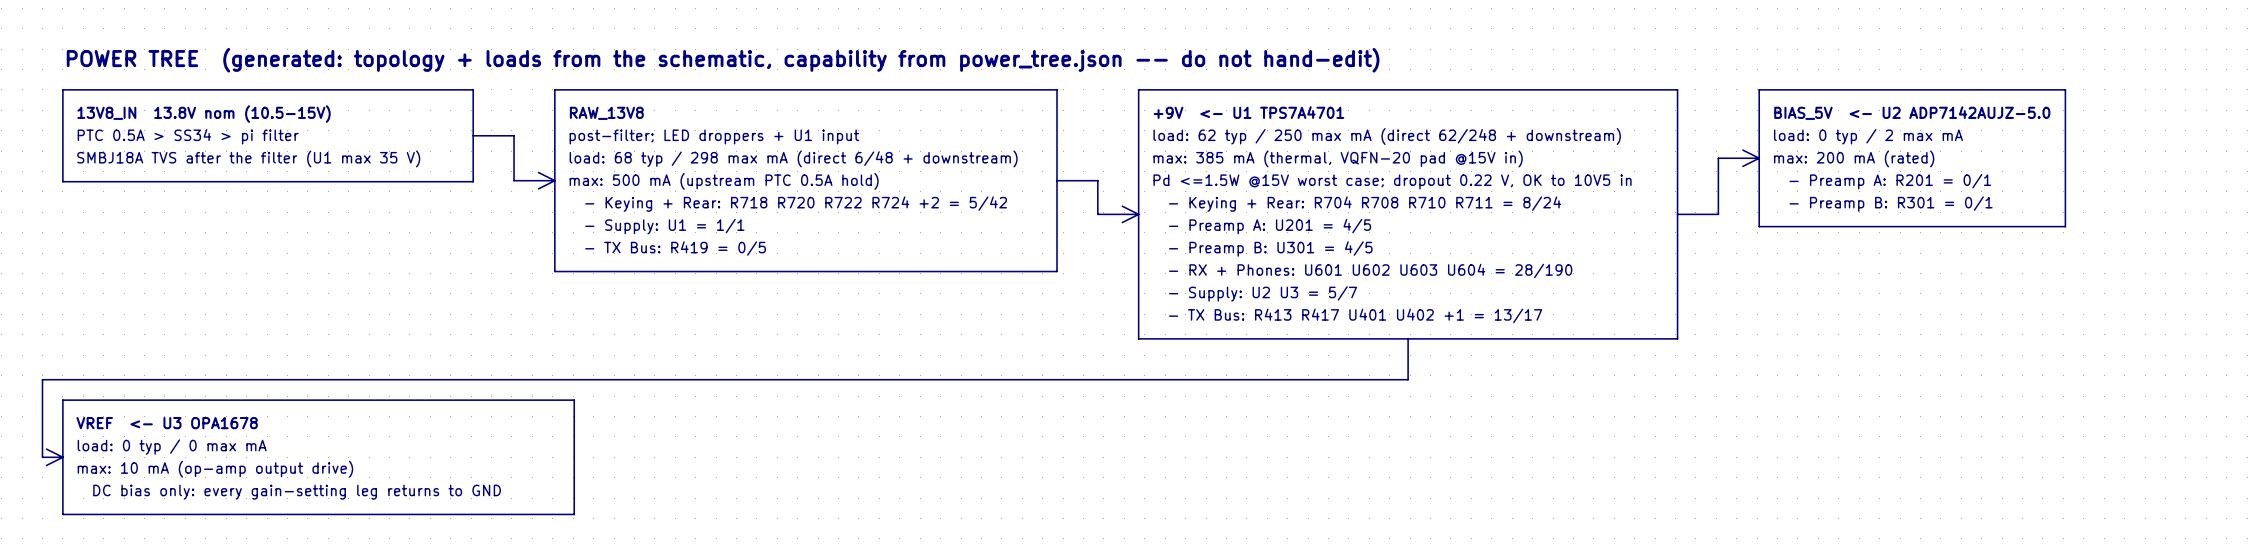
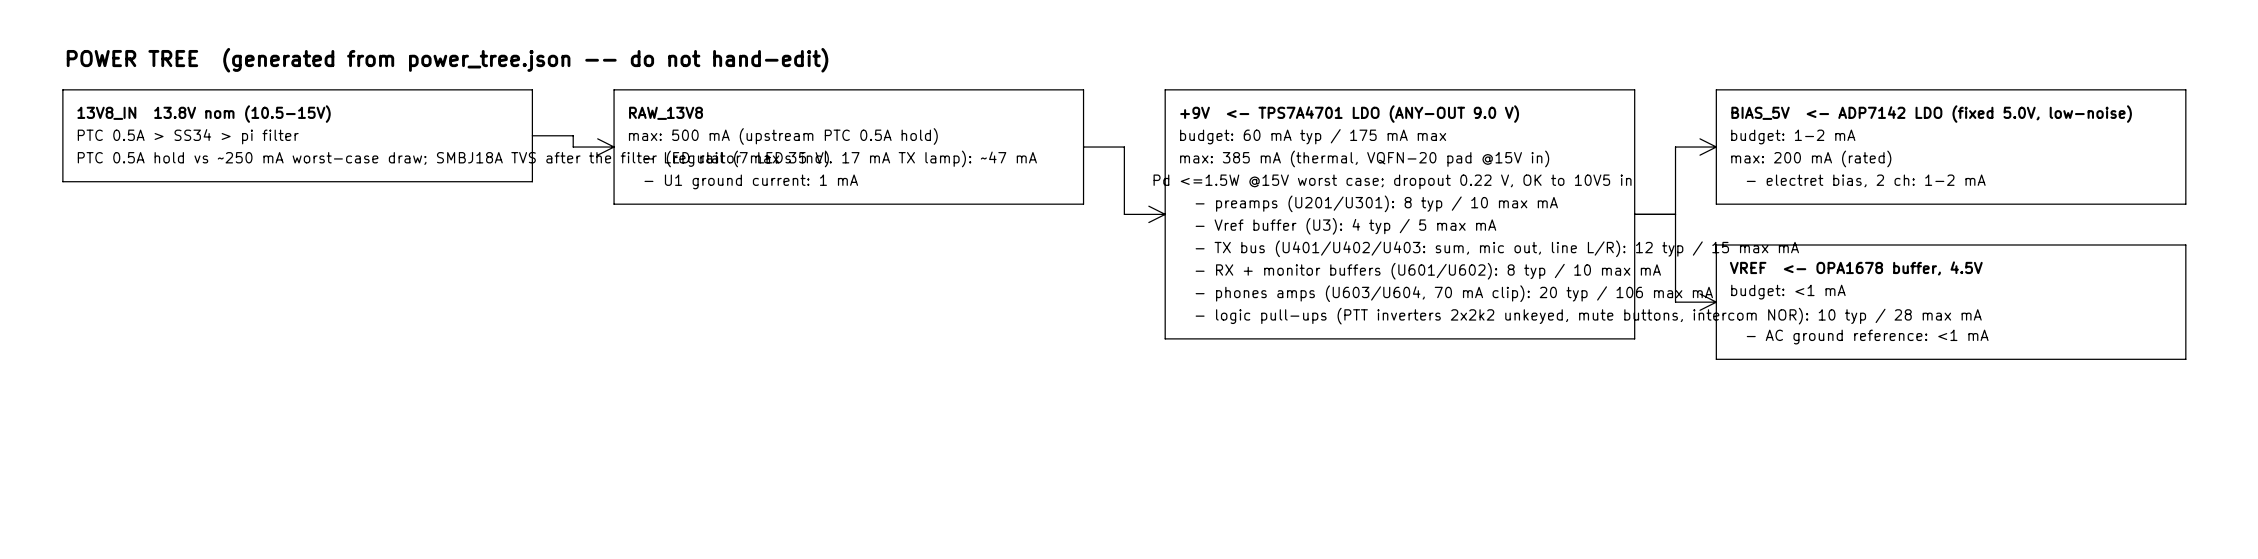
text: POWER TREE (generated: topology + loads from the schematic, capability from power_tree.json -- do not hand-edit) (723, 60) -> POWER TREE (generated from power_tree.json -- do not hand-edit) (447, 60)
line: (473, 89) (473, 181) -> (473, 89) (532, 89) (532, 181) (473, 181)
line: (614, 89) (554, 89) (554, 271) (1057, 271) (1057, 89) -> (614, 89) (614, 204) (1083, 204) (1083, 89) (1057, 89)
line: (1165, 89) (1138, 89) (1138, 338) (1165, 338) -> (1165, 89) (1165, 338)
line: (1634, 89) (1677, 89) (1677, 338) (1634, 338) -> (1634, 89) (1634, 338)
line: (1759, 89) (1759, 226) (2065, 226) (2065, 89) -> (1759, 89) (1716, 89) (1716, 204) (2185, 204) (2185, 89) (2065, 89)
text: +9V <- U1 TPS7A4701 (1248, 112) -> none
text position: RAW_13V8 (606, 113) -> RAW_13V8 (666, 113)
text: BIAS_5V <- U2 ADP7142AUJZ-5.0 (1912, 113) -> none
text: none -> +9V <- TPS7A4701 LDO (ANY-OUT 9.0 V) (1349, 114)
text: none -> BIAS_5V <- ADP7142 LDO (fixed 5.0V, low-noise) (1931, 114)
line: (473, 135) (514, 135) (514, 180) (554, 180) -> none
line: none -> (532, 135) (573, 135) (573, 147) (614, 147)
text: post-filter; LED droppers + U1 input (714, 136) -> none
text: none -> budget: 60 mA typ / 175 mA max (1313, 136)
text: load: 62 typ / 250 max mA (direct 62/248 + downstream) (1387, 136) -> none
text: none -> budget: 1-2 mA (1793, 136)
text: load: 0 typ / 2 max mA (1868, 136) -> none
line: none -> (1716, 147) (1675, 147) (1675, 302) (1716, 302)
line: (1742, 150) (1759, 158) -> (1700, 138) (1716, 147)
text: SMBJ18A TVS after the filter (U1 max 35 V) (248, 158) -> PTC 0.5A hold vs ~250 mA worst-case draw; SMBJ18A TVS after the filter (regulator max 35 V) (453, 158)
text: load: 68 typ / 298 max mA (direct 6/48 + downstream) (793, 158) -> none
text: none -> - LED rail (7 LEDs incl. 17 mA TX lamp): ~47 mA (840, 158)
text position: max: 385 mA (thermal, VQFN-20 pad @15V in) (1338, 158) -> max: 385 mA (thermal, VQFN-20 pad @15V in) (1364, 158)
line: (1759, 158) (1742, 166) -> (1716, 147) (1700, 155)
line: (1759, 158) (1718, 158) (1718, 214) (1677, 214) -> none
text position: max: 200 mA (rated) (1854, 158) -> max: 200 mA (rated) (1811, 158)
line: (538, 172) (554, 180) -> (597, 138) (614, 147)
line: (554, 180) (538, 188) -> (614, 147) (597, 155)
line: (1057, 180) (1097, 180) (1097, 214) (1124, 214) -> (1083, 147) (1124, 147) (1124, 214)
text: none -> - electret bias, 2 ch: 1-2 mA (1866, 180)
text position: max: 500 mA (upstream PTC 0.5A hold) (724, 181) -> max: 500 mA (upstream PTC 0.5A hold) (783, 136)
text: none -> - U1 ground current: 1 mA (751, 181)
text: - Preamp A: R201 = 0/1 (1890, 181) -> none
text: none -> - preamps (U201/U301): 8 typ / 10 max mA (1376, 203)
text: - Keying + Rear: R718 R720 R722 R724 +2 = 5/42 (796, 204) -> none
text: - Keying + Rear: R704 R708 R710 R711 = 8/24 (1365, 204) -> none
text: - Preamp B: R301 = 0/1 (1891, 204) -> none
line: (1122, 206) (1138, 214) (1122, 222) -> none
line: none -> (1148, 206) (1165, 214)
line: none -> (1138, 214) (1165, 214)
line: none -> (1165, 214) (1148, 222)
line: none -> (1634, 214) (1675, 214)
text: - Supply: U1 = 1/1 (664, 226) -> none
text: - Preamp A: U201 = 4/5 (1270, 226) -> none
text: none -> - Vref buffer (U3): 4 typ / 5 max mA (1345, 226)
line: none -> (1716, 244) (1716, 359) (2185, 359) (2185, 244) (1716, 244)
text: - TX Bus: R419 = 0/5 (675, 248) -> none
text: none -> - TX bus (U401/U402/U403: sum, mic out, line L/R): 12 typ / 15 max mA (1497, 248)
text: - Preamp B: U301 = 4/5 (1270, 249) -> none
text: none -> VREF <- OPA1678 buffer, 4.5V (1856, 268)
text: - RX + Phones: U601 U602 U603 U604 = 28/190 (1370, 270) -> none
text: none -> - RX + monitor buffers (U601/U602): 8 typ / 10 max mA (1428, 271)
text: none -> budget: <1 mA (1788, 292)
text: - Supply: U2 U3 = 5/7 (1263, 293) -> none
text: none -> - phones amps (U603/U604, 70 mA clip): 20 typ / 106 max mA (1454, 293)
line: none -> (1700, 293) (1716, 302)
line: none -> (1716, 302) (1700, 310)
text: - TX Bus: R413 R417 U401 U402 +1 = 13/17 (1355, 315) -> none
text: none -> - logic pull-ups (PTT inverters 2x2k2 unkeyed, mute buttons, intercom NOR): 10 typ / 28 max mA (1588, 316)
text: none -> - AC ground reference: <1 mA (1867, 337)
line: (1408, 338) (1408, 379) (42, 379) (42, 457) (62, 457) -> none
line: (62, 400) (62, 514) (574, 514) (574, 400) (62, 400) -> none
text: VREF <- U3 OPA1678 (167, 423) -> none
text: load: 0 typ / 0 max mA (172, 447) -> none
line: (46, 449) (62, 457) -> none
line: (62, 457) (46, 465) -> none
text: max: 10 mA (op-amp output drive) (215, 469) -> none
text: DC bias only: every gain-setting leg returns to GND (297, 492) -> none

